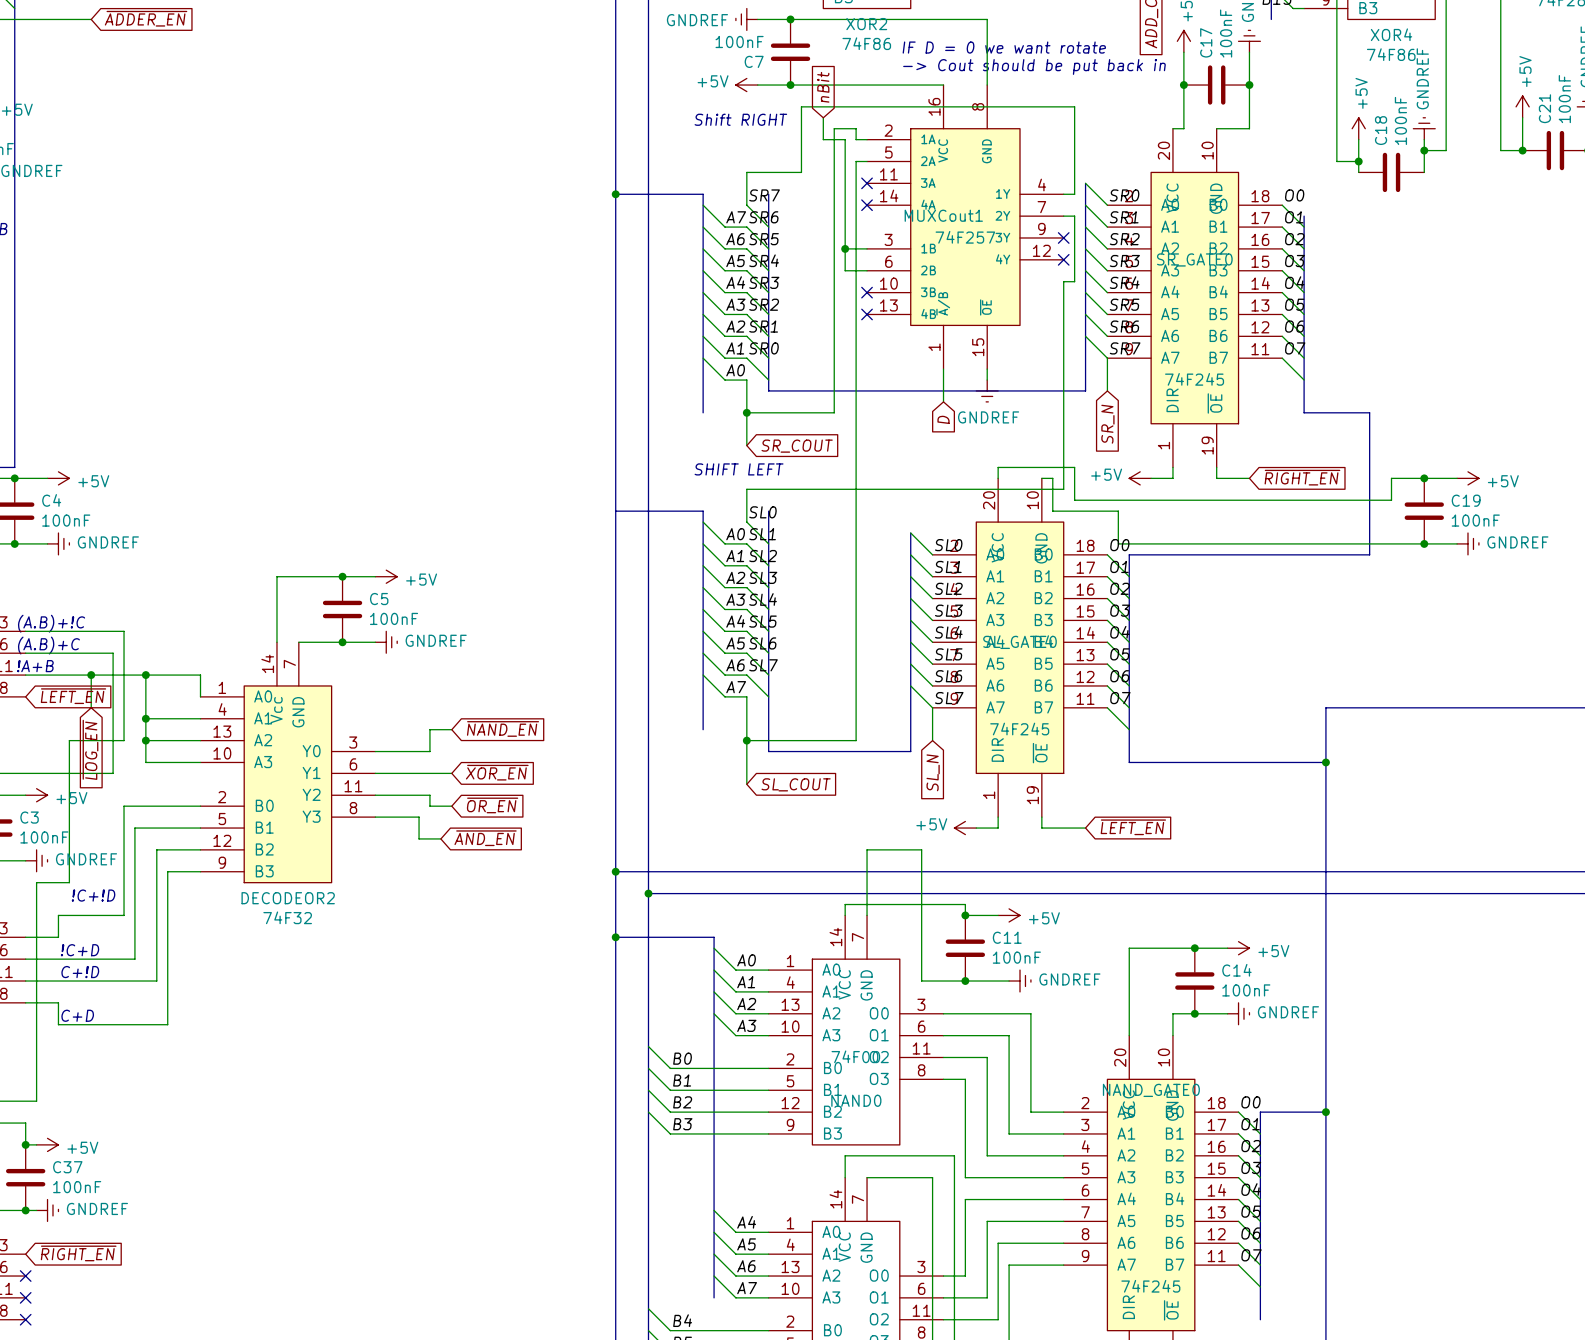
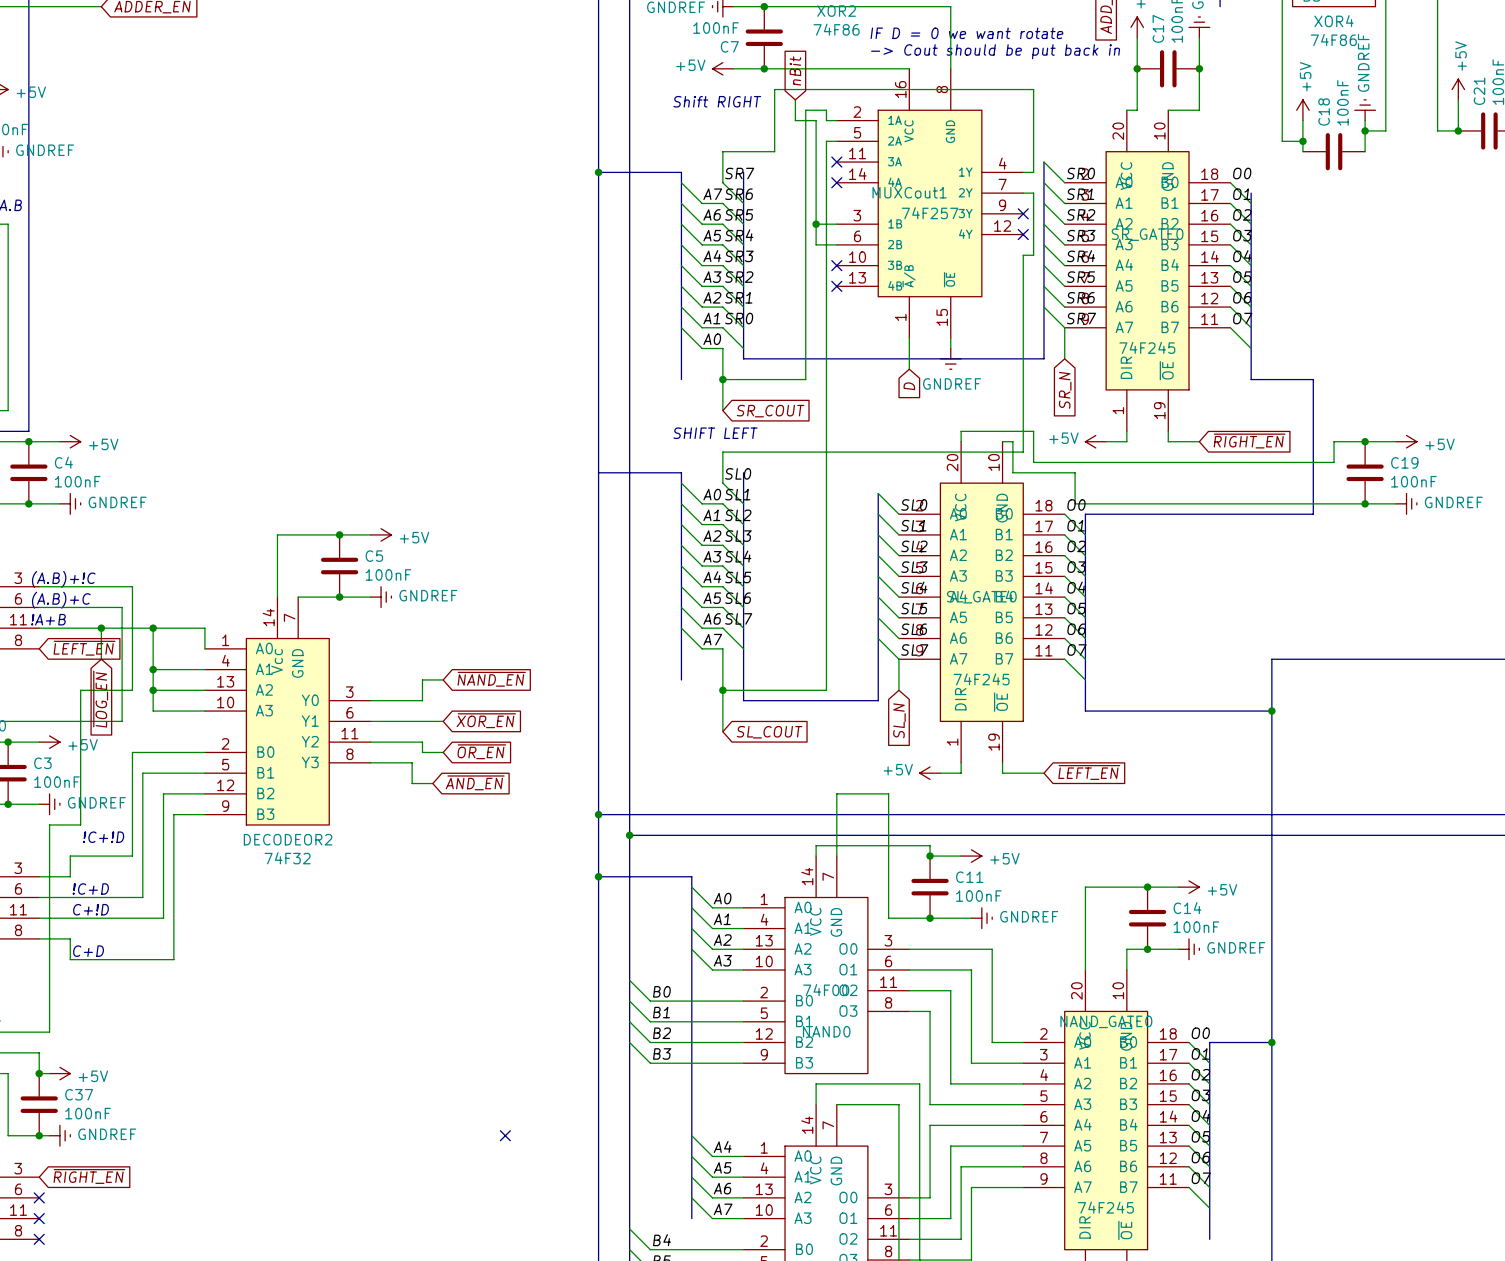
no-connect mark: none -> (505, 1135)

